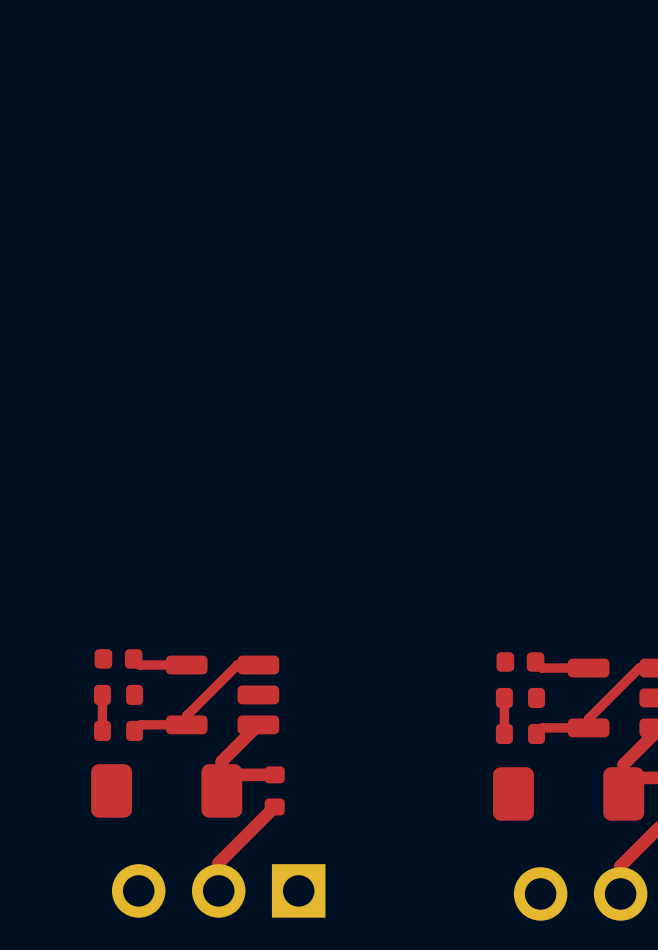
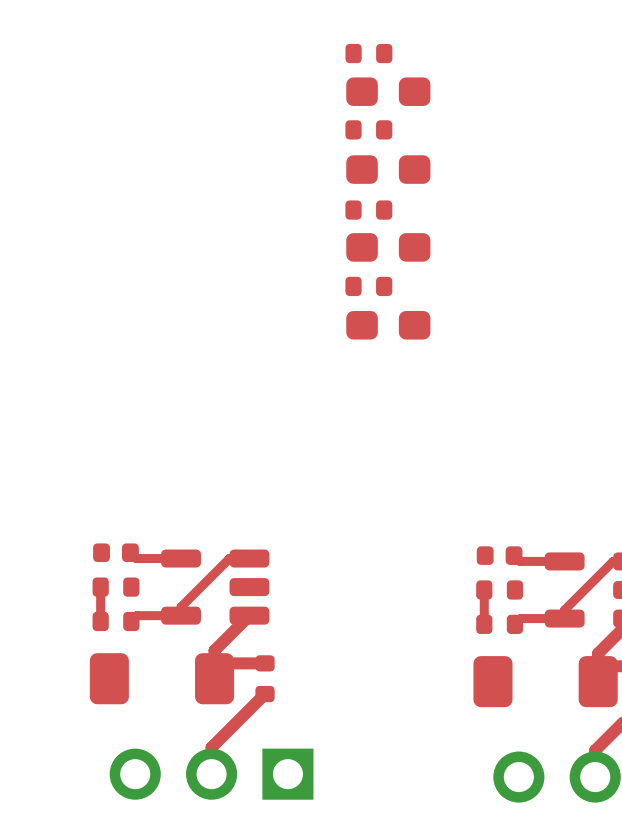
part: none -> (368, 53)
part: none -> (388, 91)
part: none -> (368, 129)
part: none -> (388, 169)
part: none -> (368, 210)
part: none -> (388, 247)
part: none -> (368, 286)
part: none -> (388, 325)

